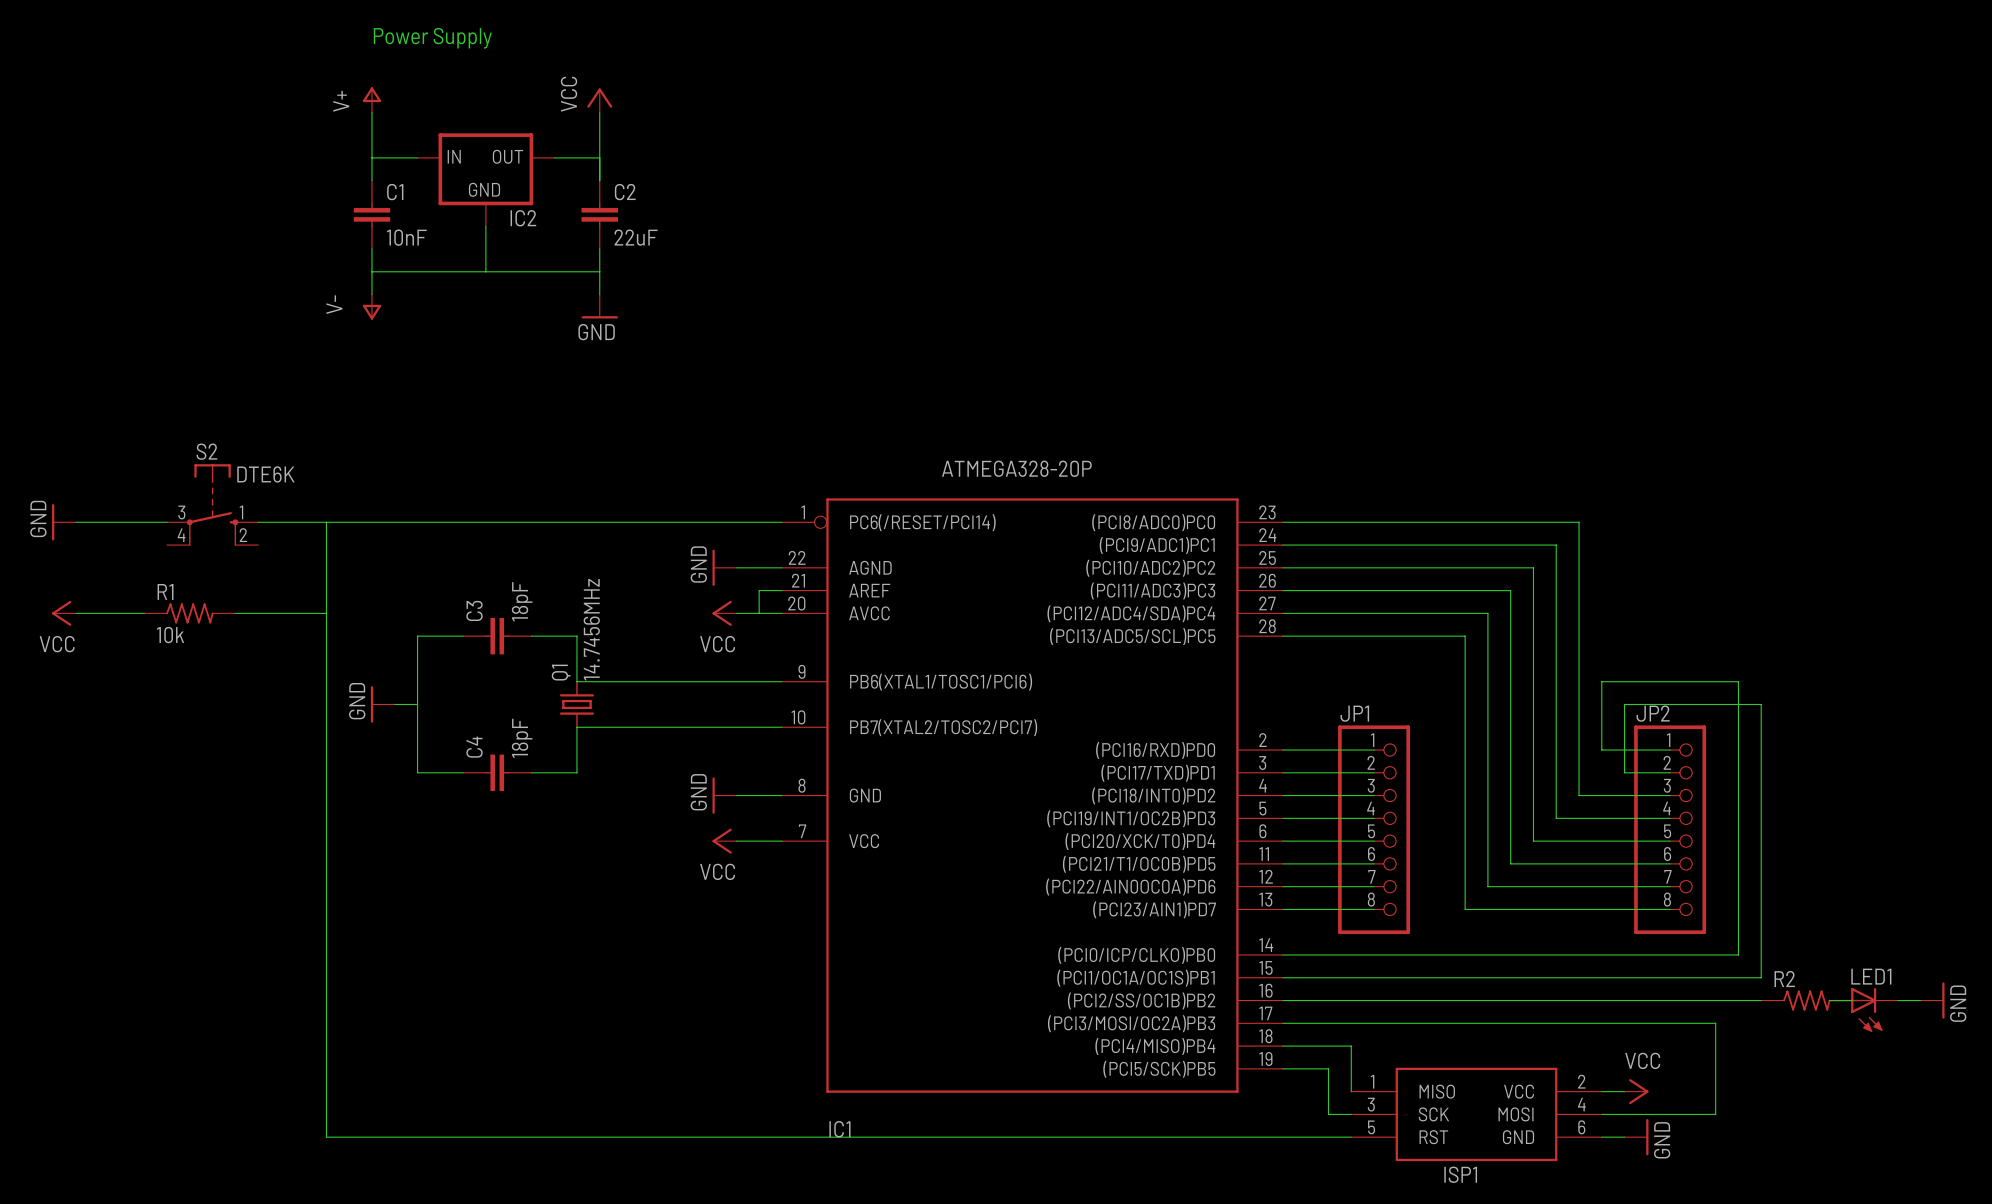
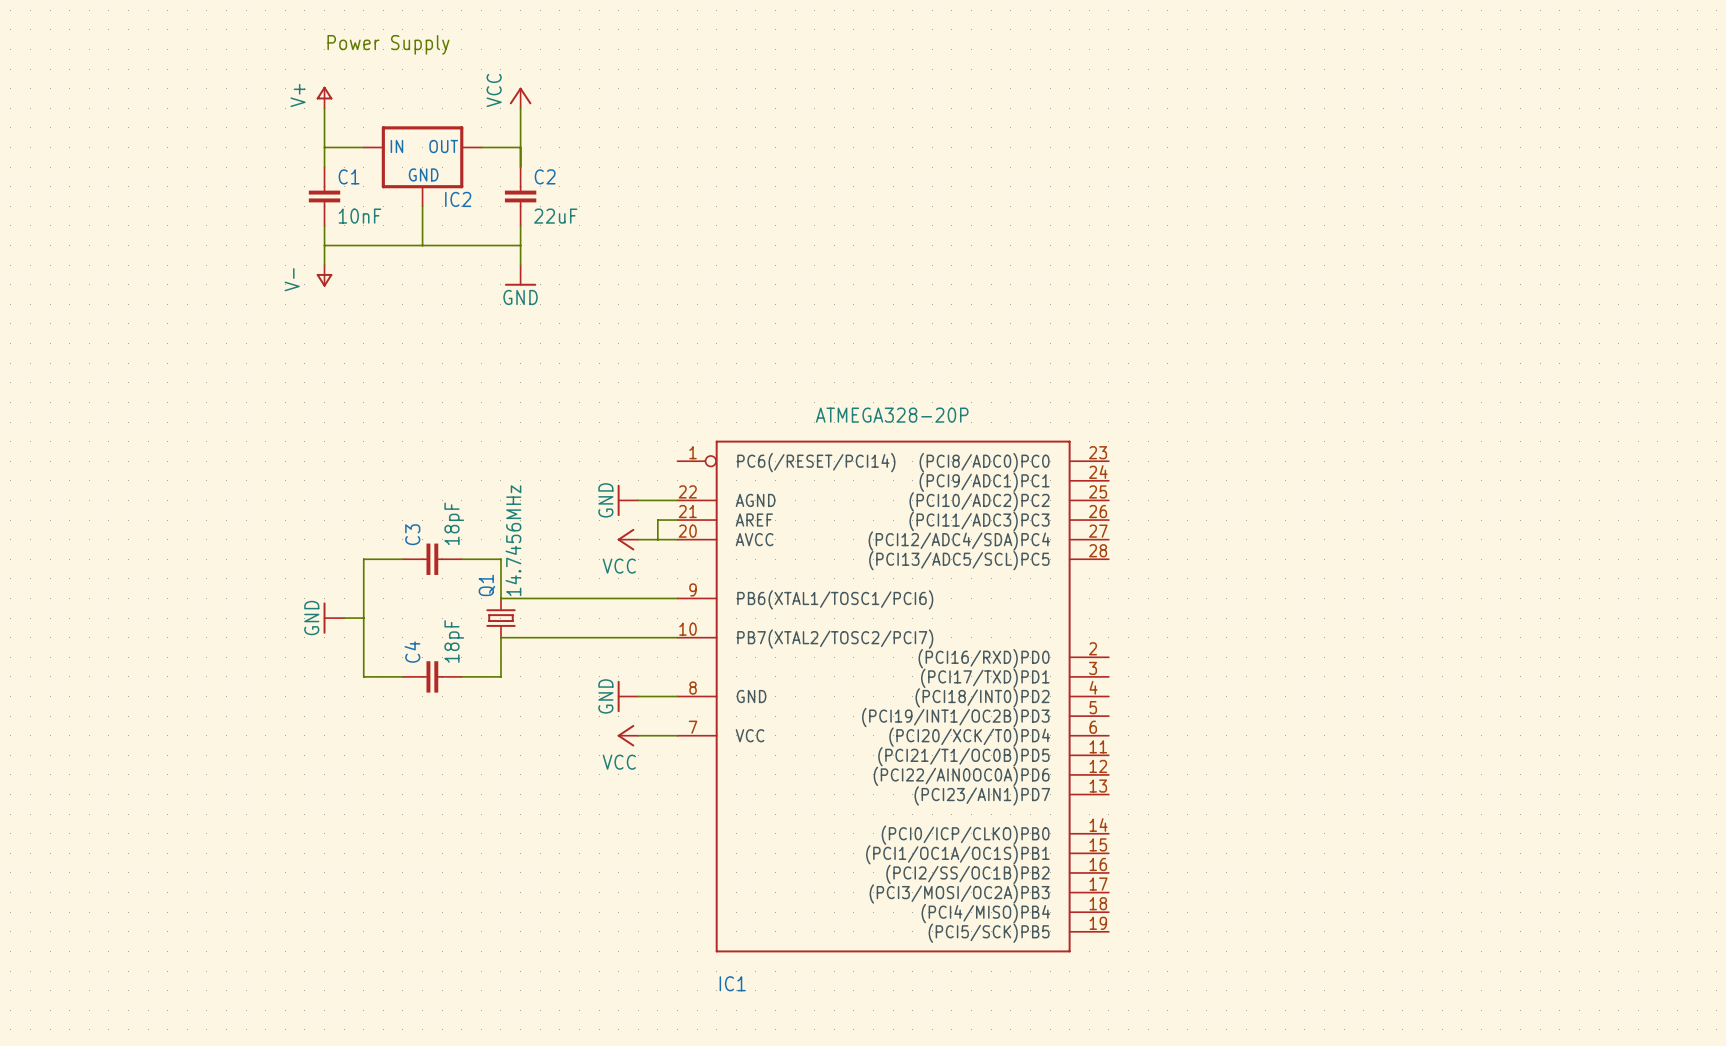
S2: DTE6K (212, 504) -> none
power symbol: GND (63, 522) -> none
wire: (75, 522) (167, 522) -> none
wire: (258, 522) (781, 522) -> none
wire: (326, 522) (326, 1137) (1351, 1137) -> none
wire: (1282, 522) (1579, 522) (1579, 795) (1670, 795) -> none
wire: (1282, 545) (1556, 545) (1556, 818) (1670, 818) -> none
wire: (1282, 567) (1533, 567) (1533, 841) (1670, 841) -> none
wire: (1282, 590) (1510, 590) (1510, 863) (1670, 863) -> none
power symbol: VCC (63, 613) -> none
wire: (75, 613) (144, 613) -> none
R1: 10k (189, 613) -> none
wire: (235, 613) (326, 613) -> none
wire: (1282, 613) (1487, 613) (1487, 886) (1670, 886) -> none
wire: (1282, 636) (1465, 636) (1465, 909) (1670, 909) -> none
wire: (1282, 750) (1374, 750) -> none
wire: (1670, 750) (1601, 750) (1601, 681) (1738, 681) (1738, 954) (1282, 954) -> none
wire: (1282, 772) (1374, 772) -> none
wire: (1670, 772) (1624, 772) (1624, 704) (1761, 704) (1761, 977) (1282, 977) -> none
wire: (1282, 795) (1374, 795) -> none
wire: (1282, 818) (1374, 818) -> none
JP1: (1374, 829) -> none
JP2: (1670, 829) -> none
wire: (1282, 841) (1374, 841) -> none
wire: (1282, 863) (1374, 863) -> none
wire: (1282, 886) (1374, 886) -> none
wire: (1282, 909) (1374, 909) -> none
wire: (1282, 1000) (1761, 1000) -> none
R2: (1806, 1000) -> none
wire: (1829, 1000) (1852, 1000) -> none
wire: (1897, 1000) (1920, 1000) -> none
power symbol: GND (1932, 1000) -> none
LED1: (1863, 1009) -> none
wire: (1282, 1023) (1715, 1023) (1715, 1114) (1601, 1114) -> none
wire: (1282, 1046) (1351, 1046) (1351, 1091) -> none
wire: (1282, 1068) (1328, 1068) (1328, 1114) (1351, 1114) -> none
wire: (1601, 1091) (1624, 1091) -> none
power symbol: VCC (1636, 1091) -> none
ISP1: (1476, 1114) -> none
wire: (1601, 1137) (1624, 1137) -> none
power symbol: GND (1636, 1137) -> none

